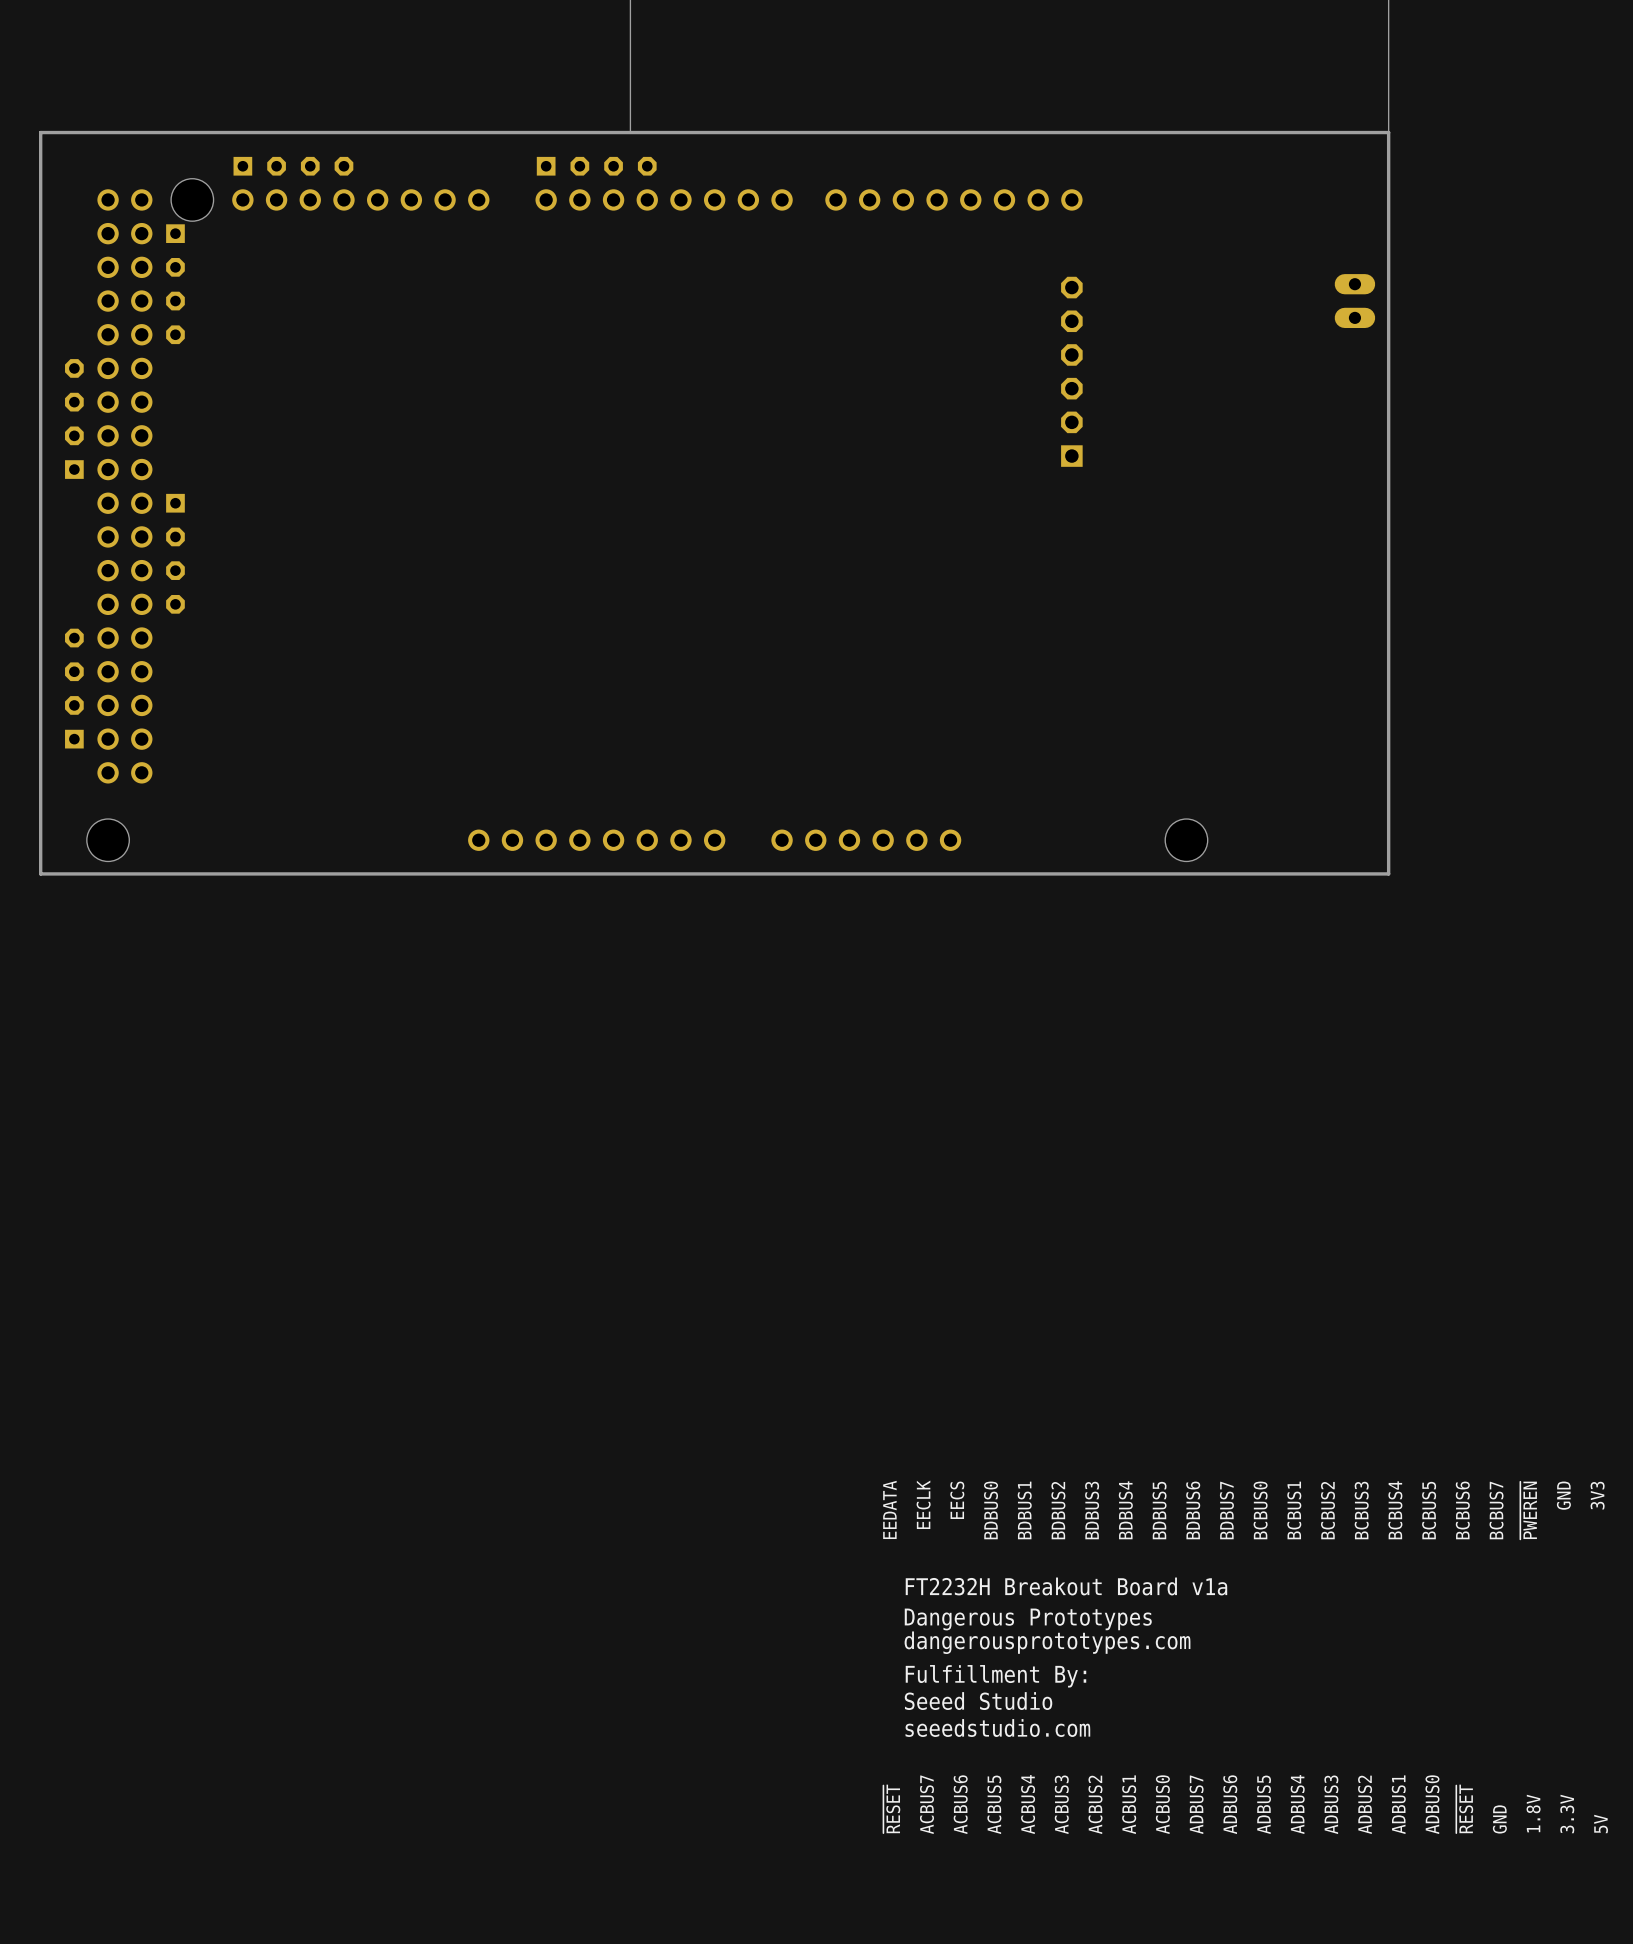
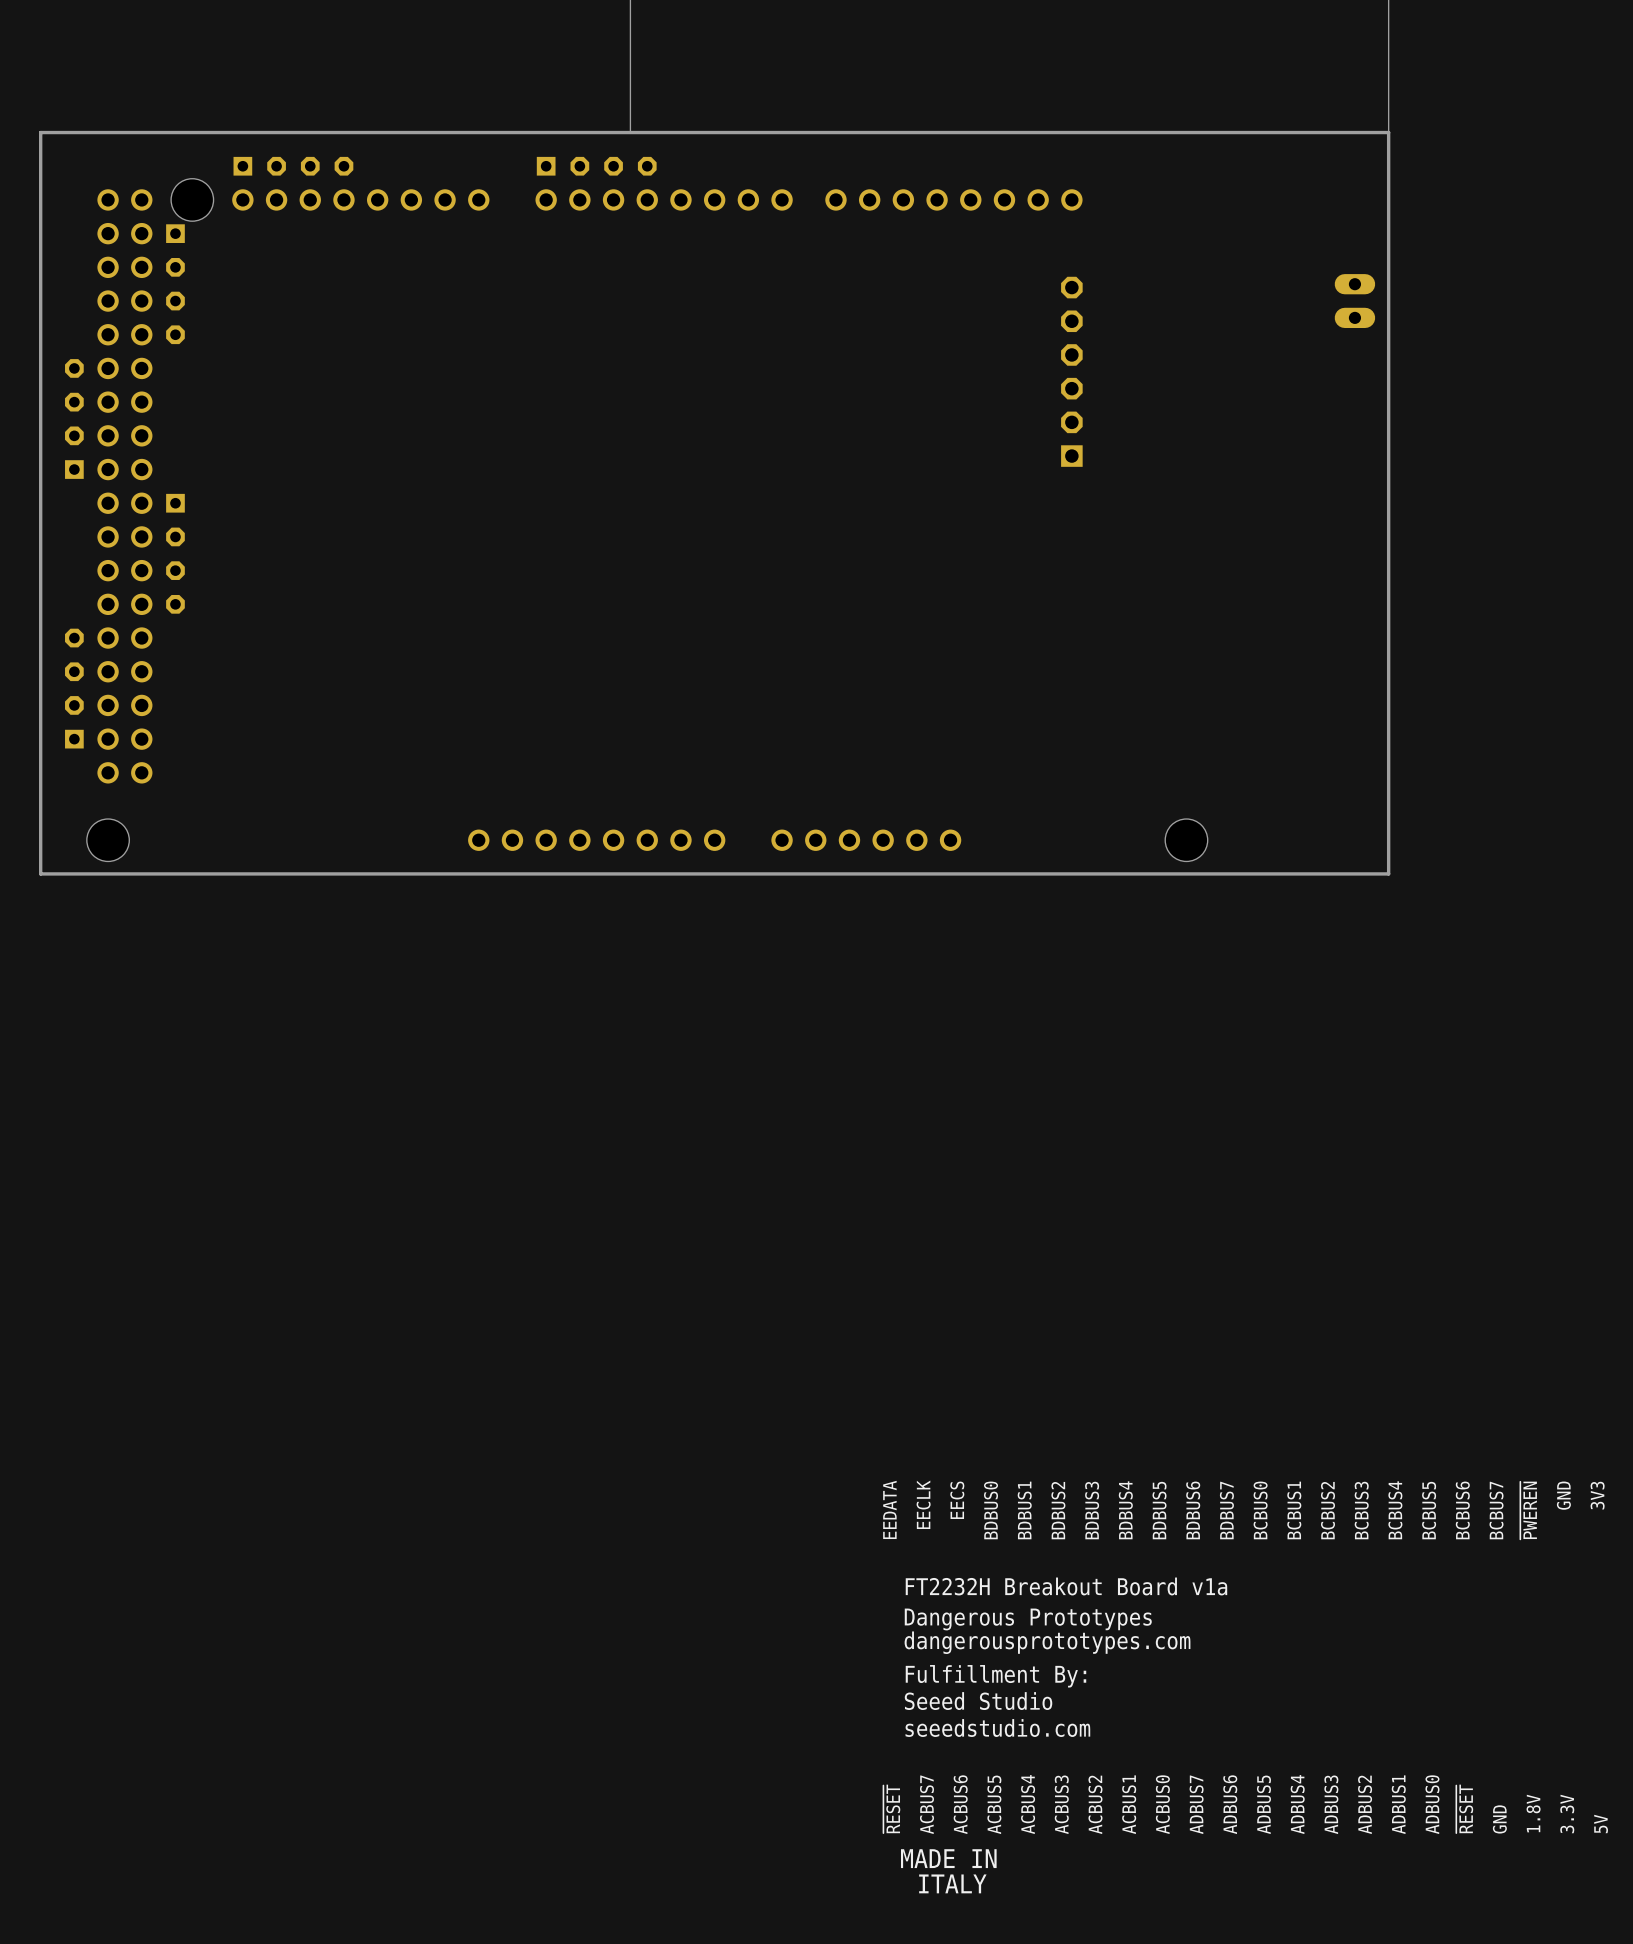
text: none -> MADE IN (948, 1858)
text: none -> ITALY (952, 1883)

